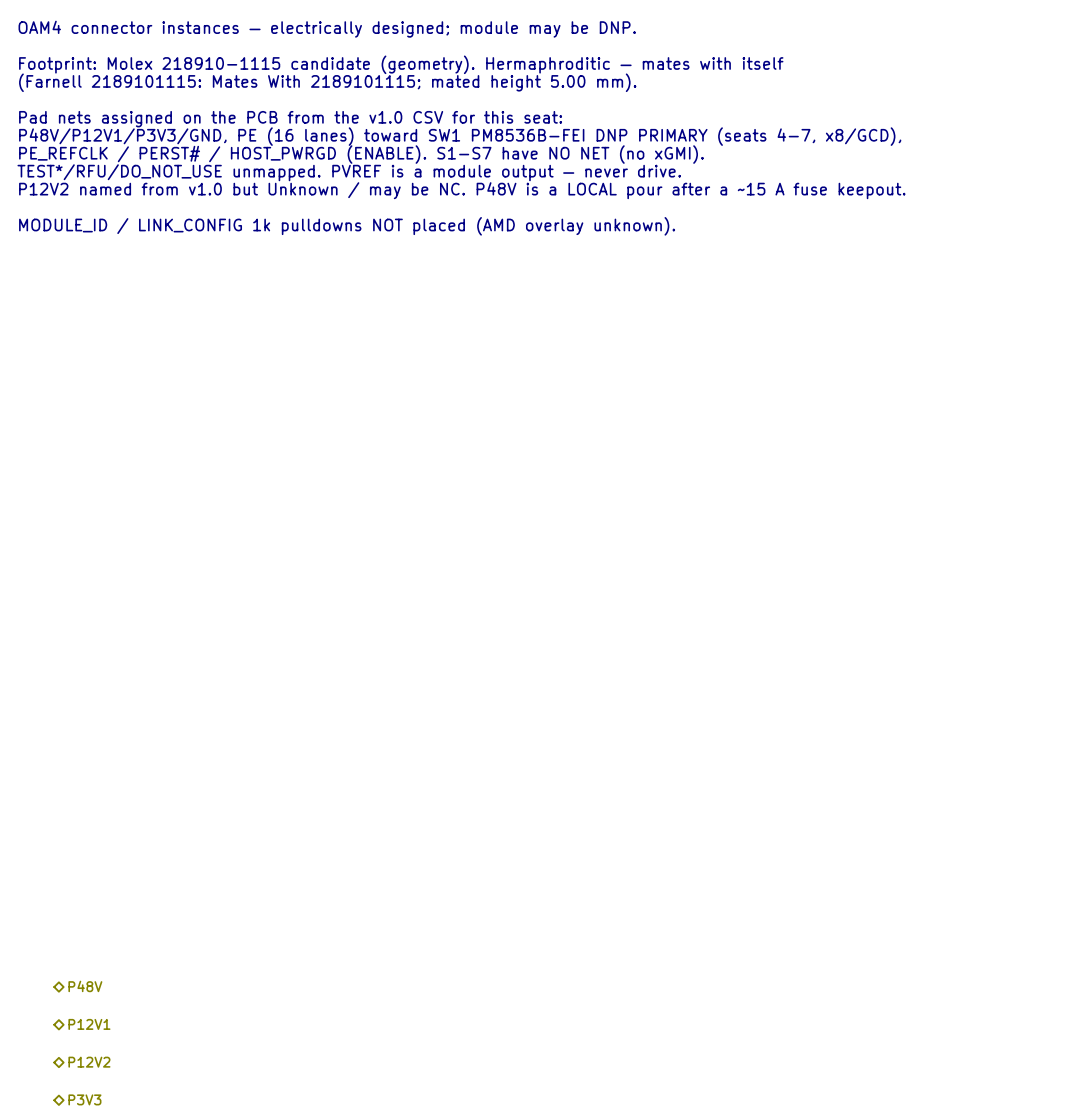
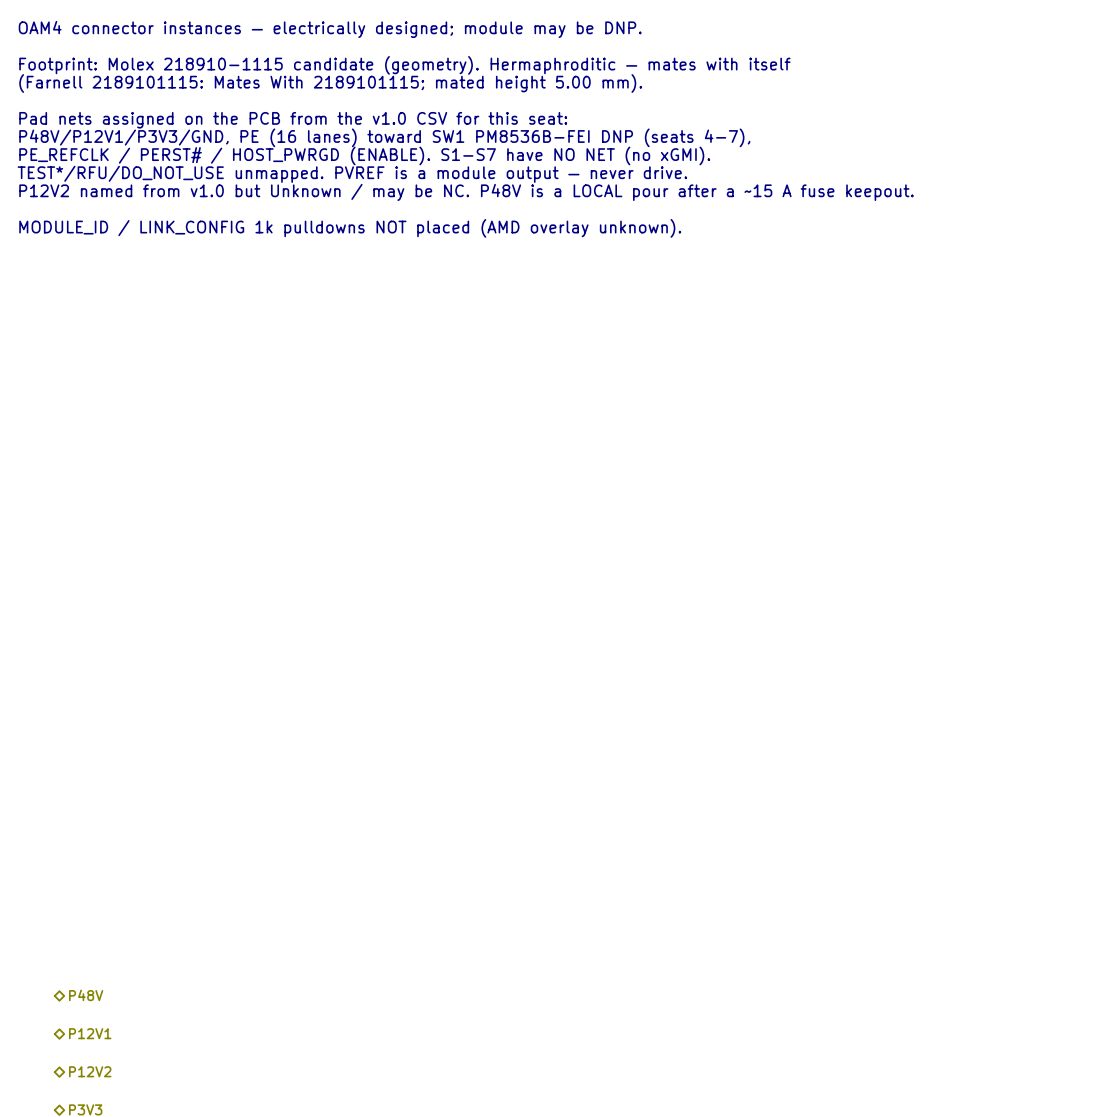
text: P48V/P12V1/P3V3/GND, PE (16 lanes) toward SW1 PM8536B-FEI DNP PRIMARY (seats 4-7, x8/GCD), (460, 136) -> P48V/P12V1/P3V3/GND, PE (16 lanes) toward SW1 PM8536B-FEI DNP (seats 4-7), (384, 137)

